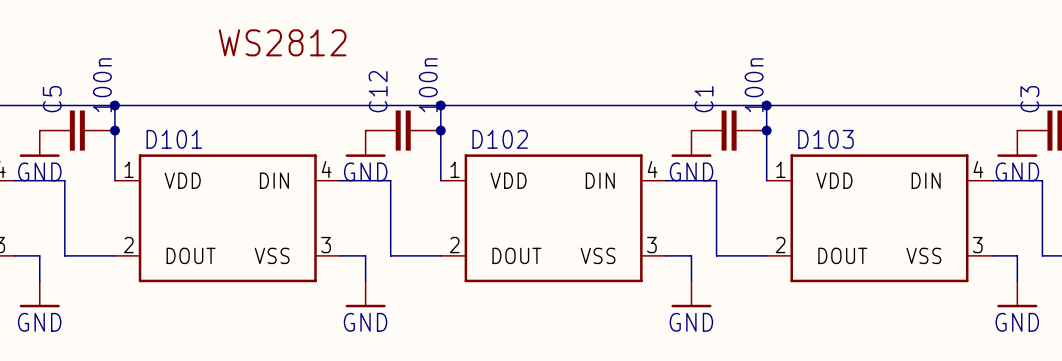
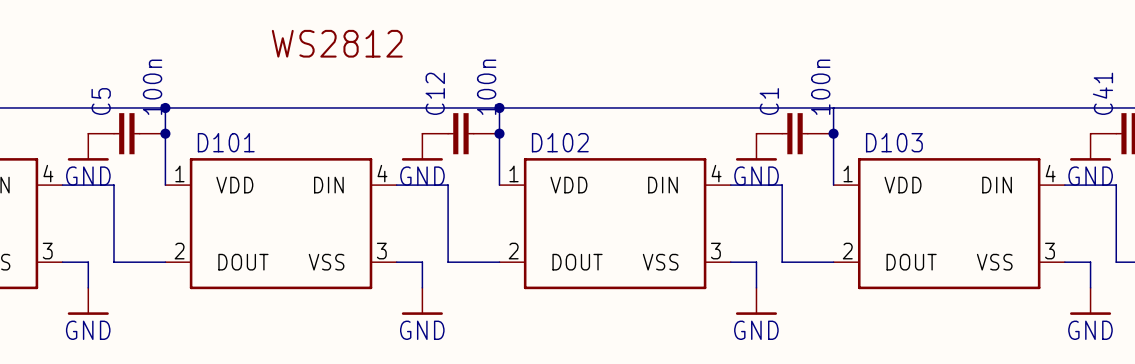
C3 name: C3 (1029, 99) -> C41 (1102, 93)
junction: (766, 105) -> none

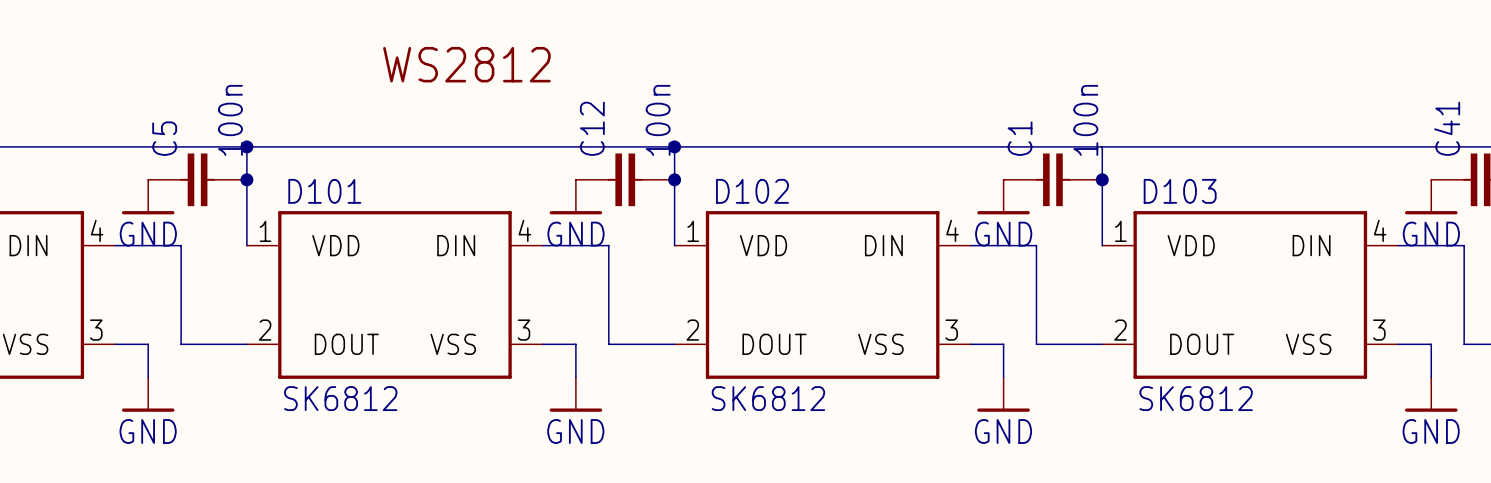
D101 value: none -> SK6812 (340, 398)
D102 value: none -> SK6812 (768, 398)
D103 value: none -> SK6812 (1196, 398)

